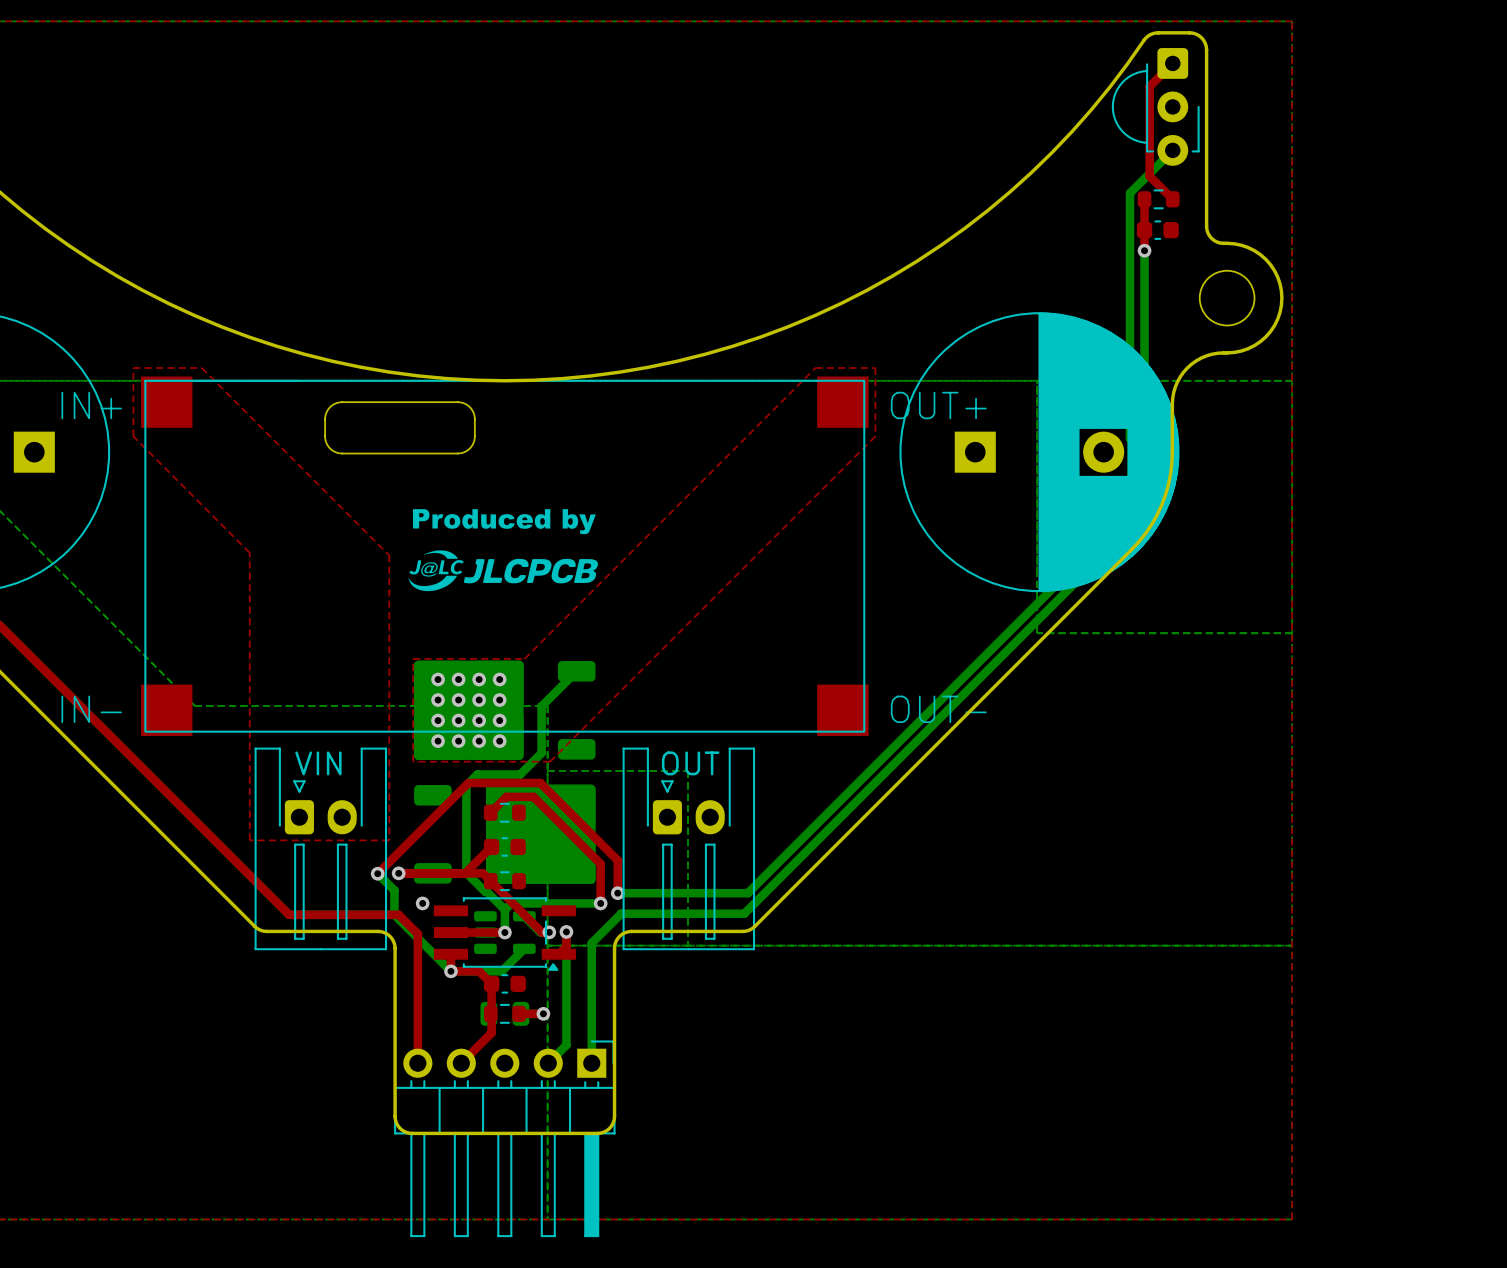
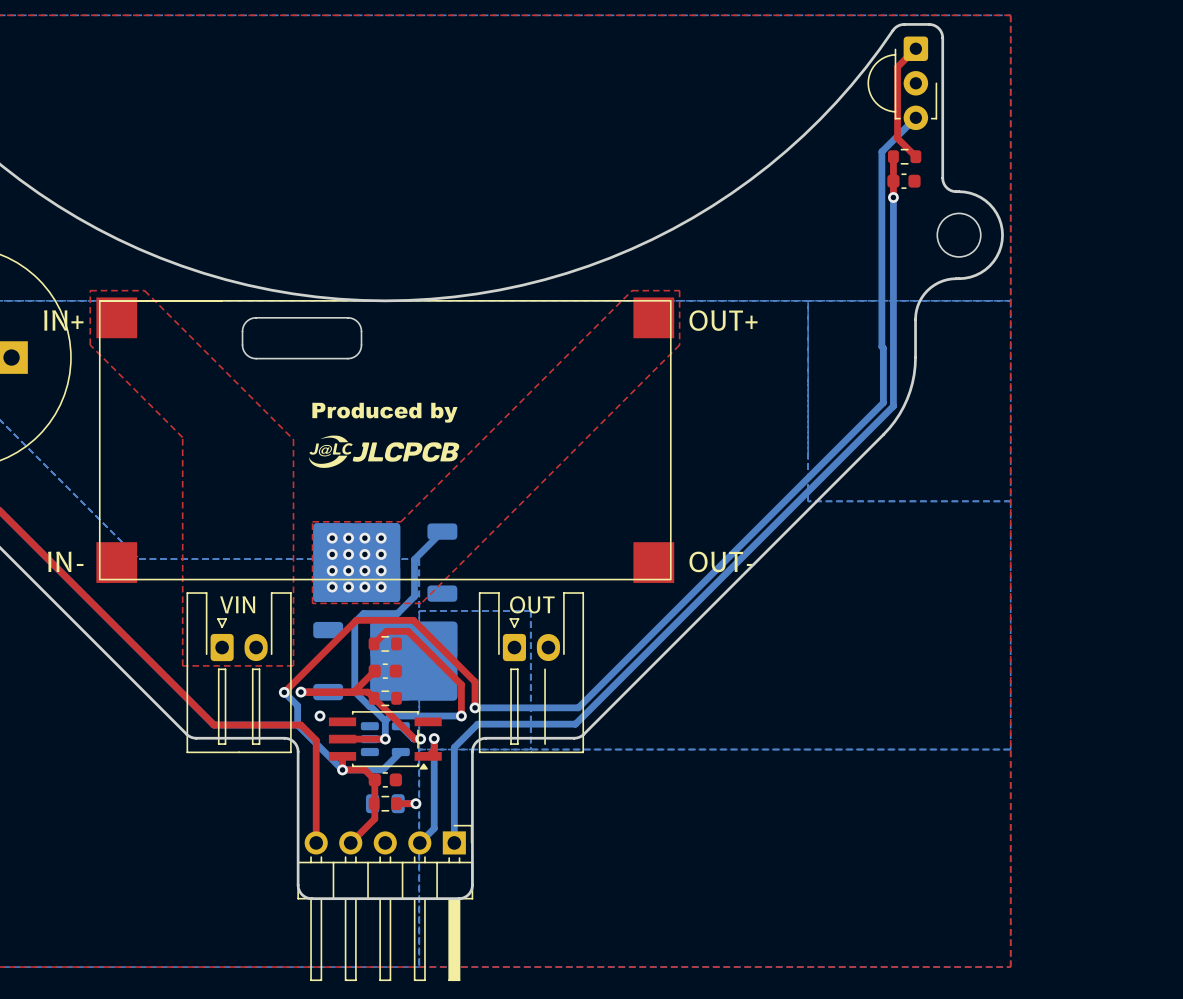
part: (1039, 452) -> none
part footprint: [622, 747, 756, 951] -> [478, 592, 585, 754]

